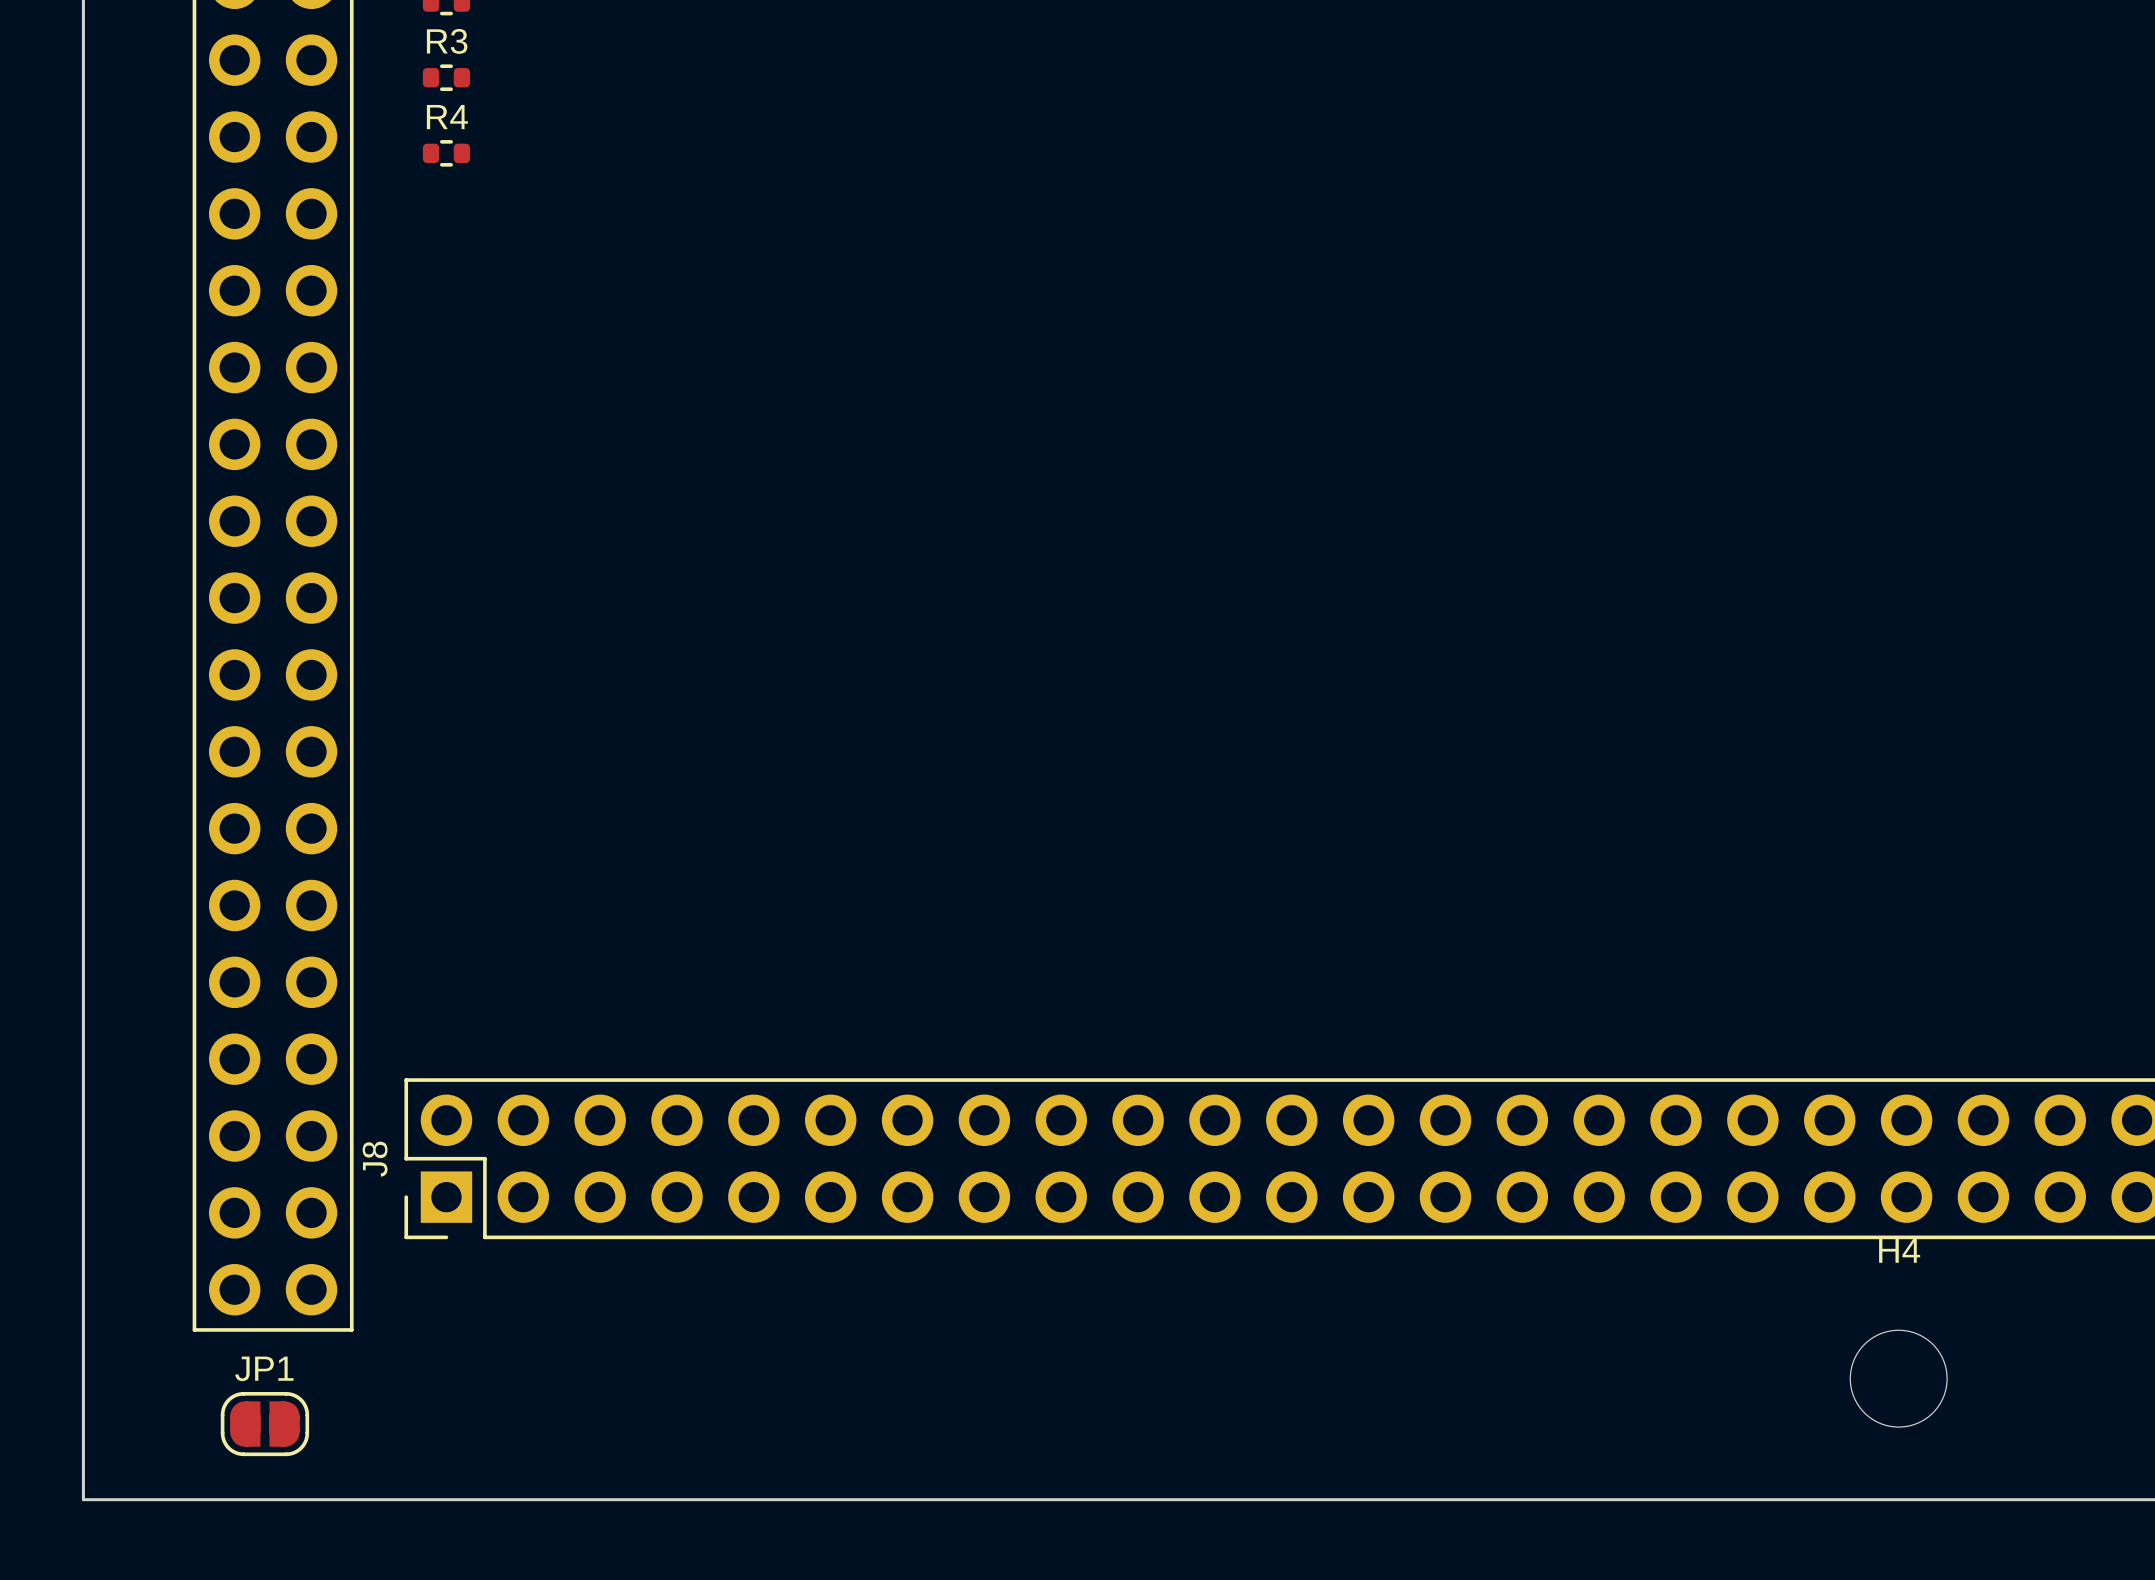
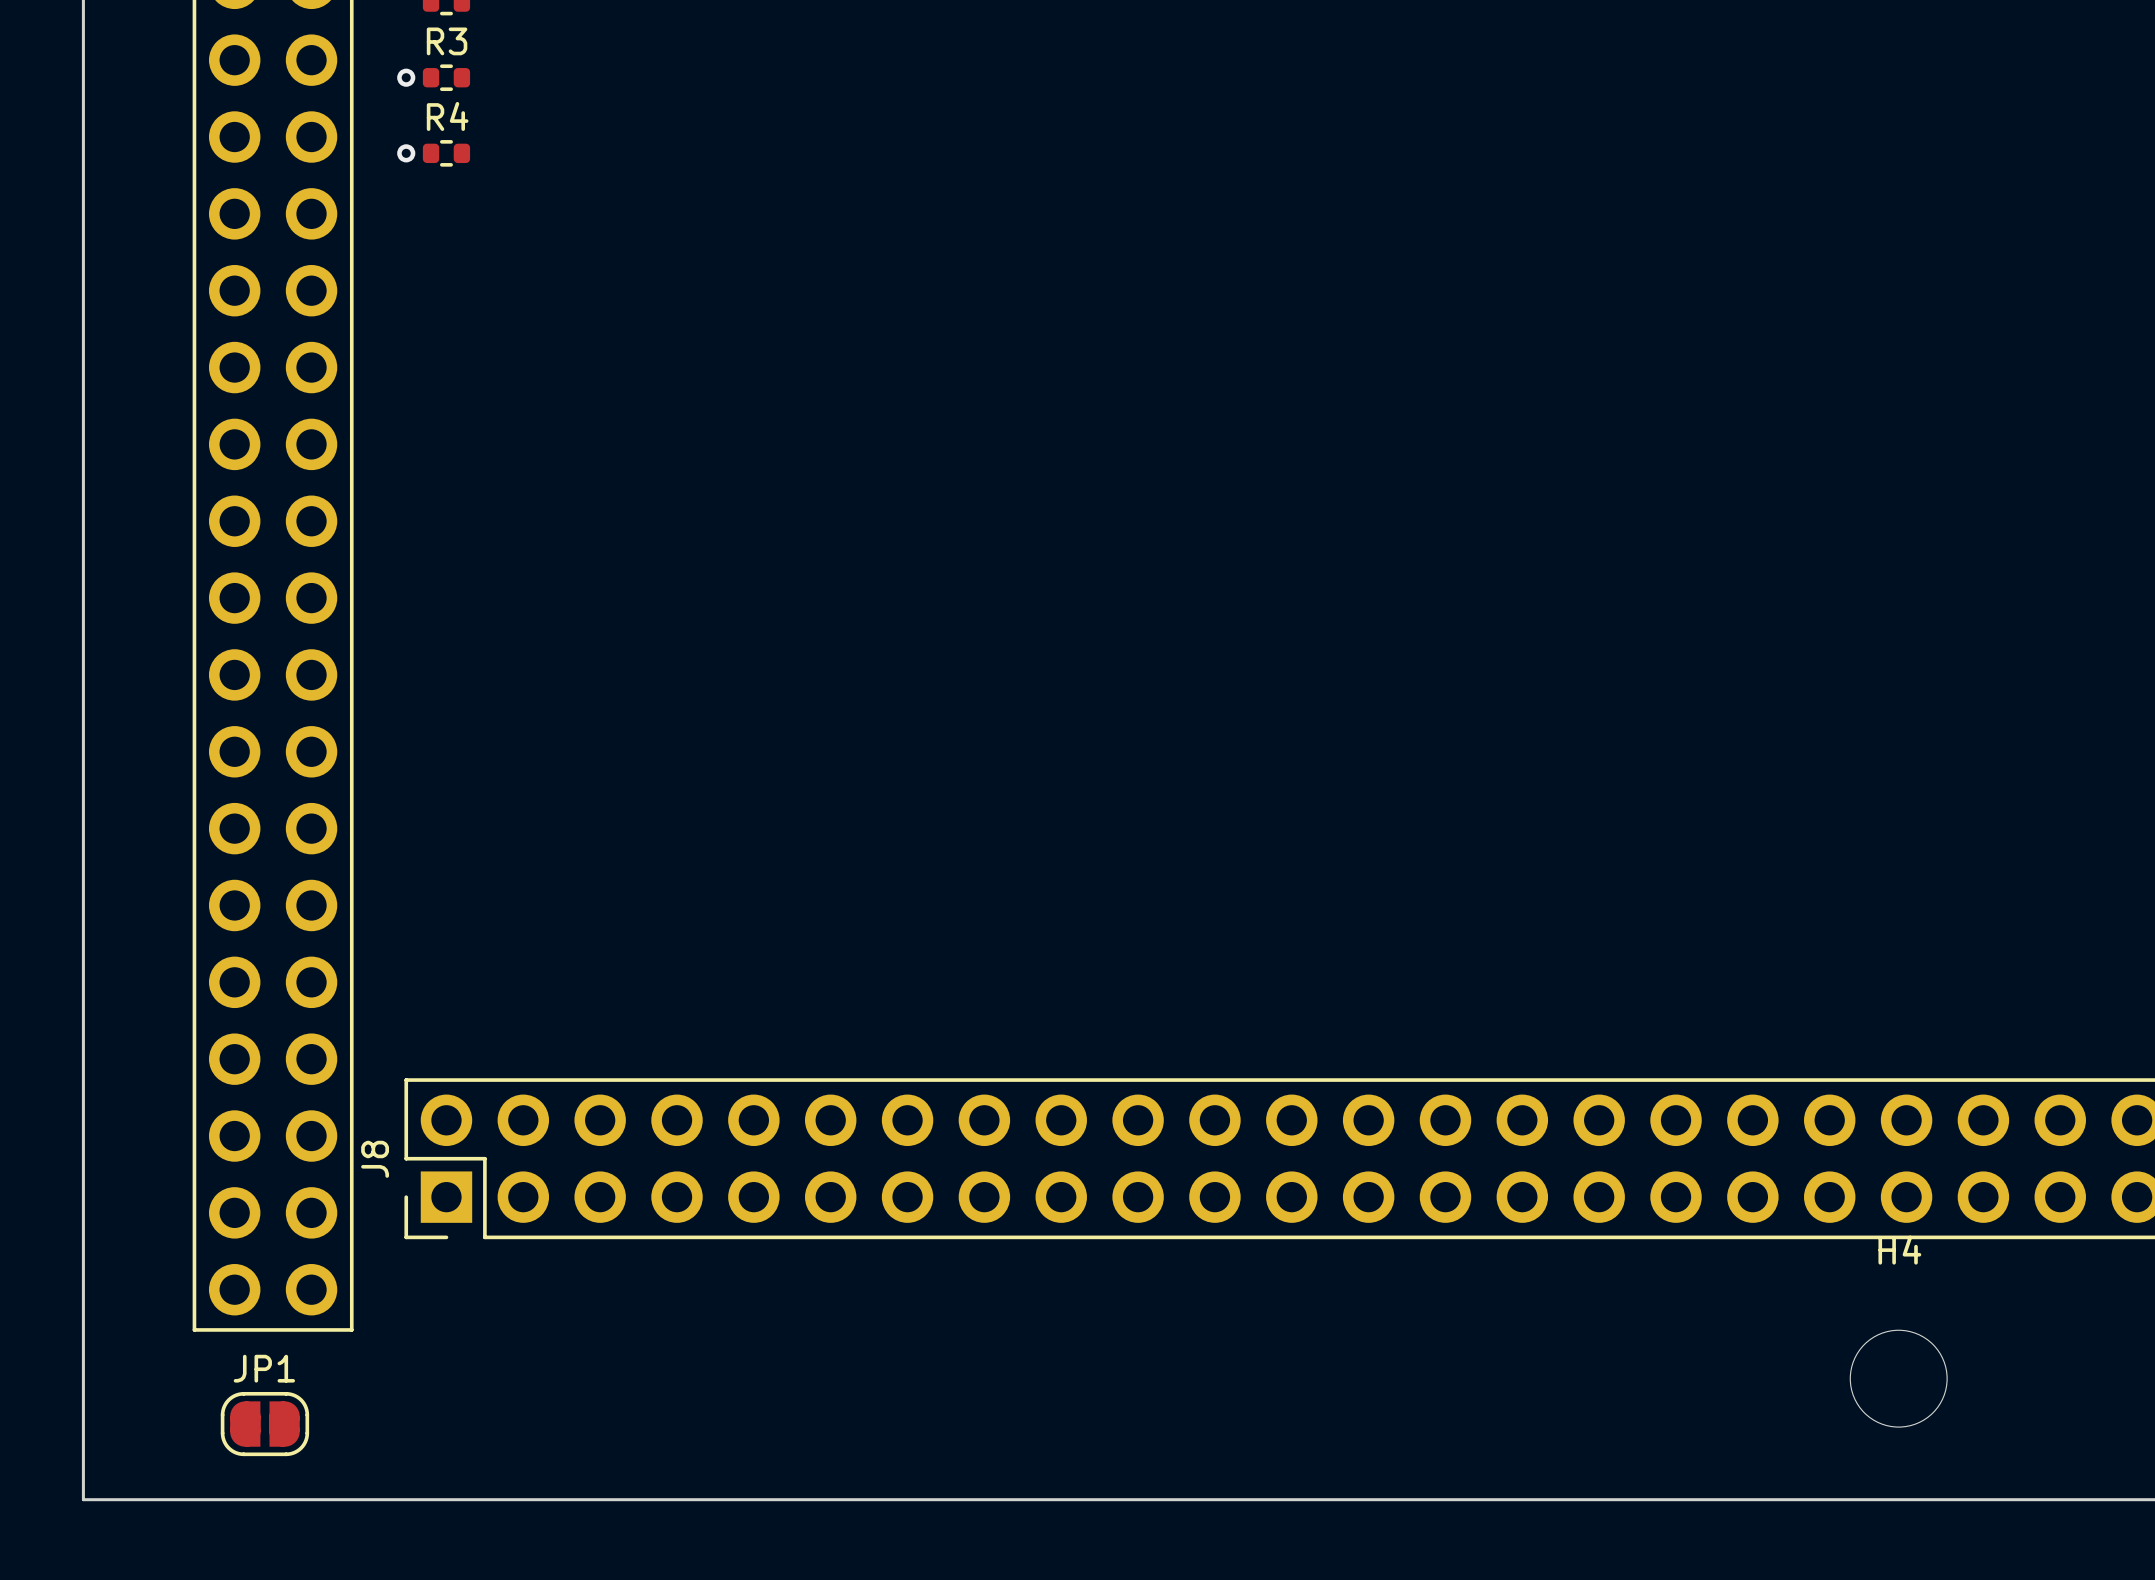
via: none -> (406, 77)
via: none -> (406, 153)

